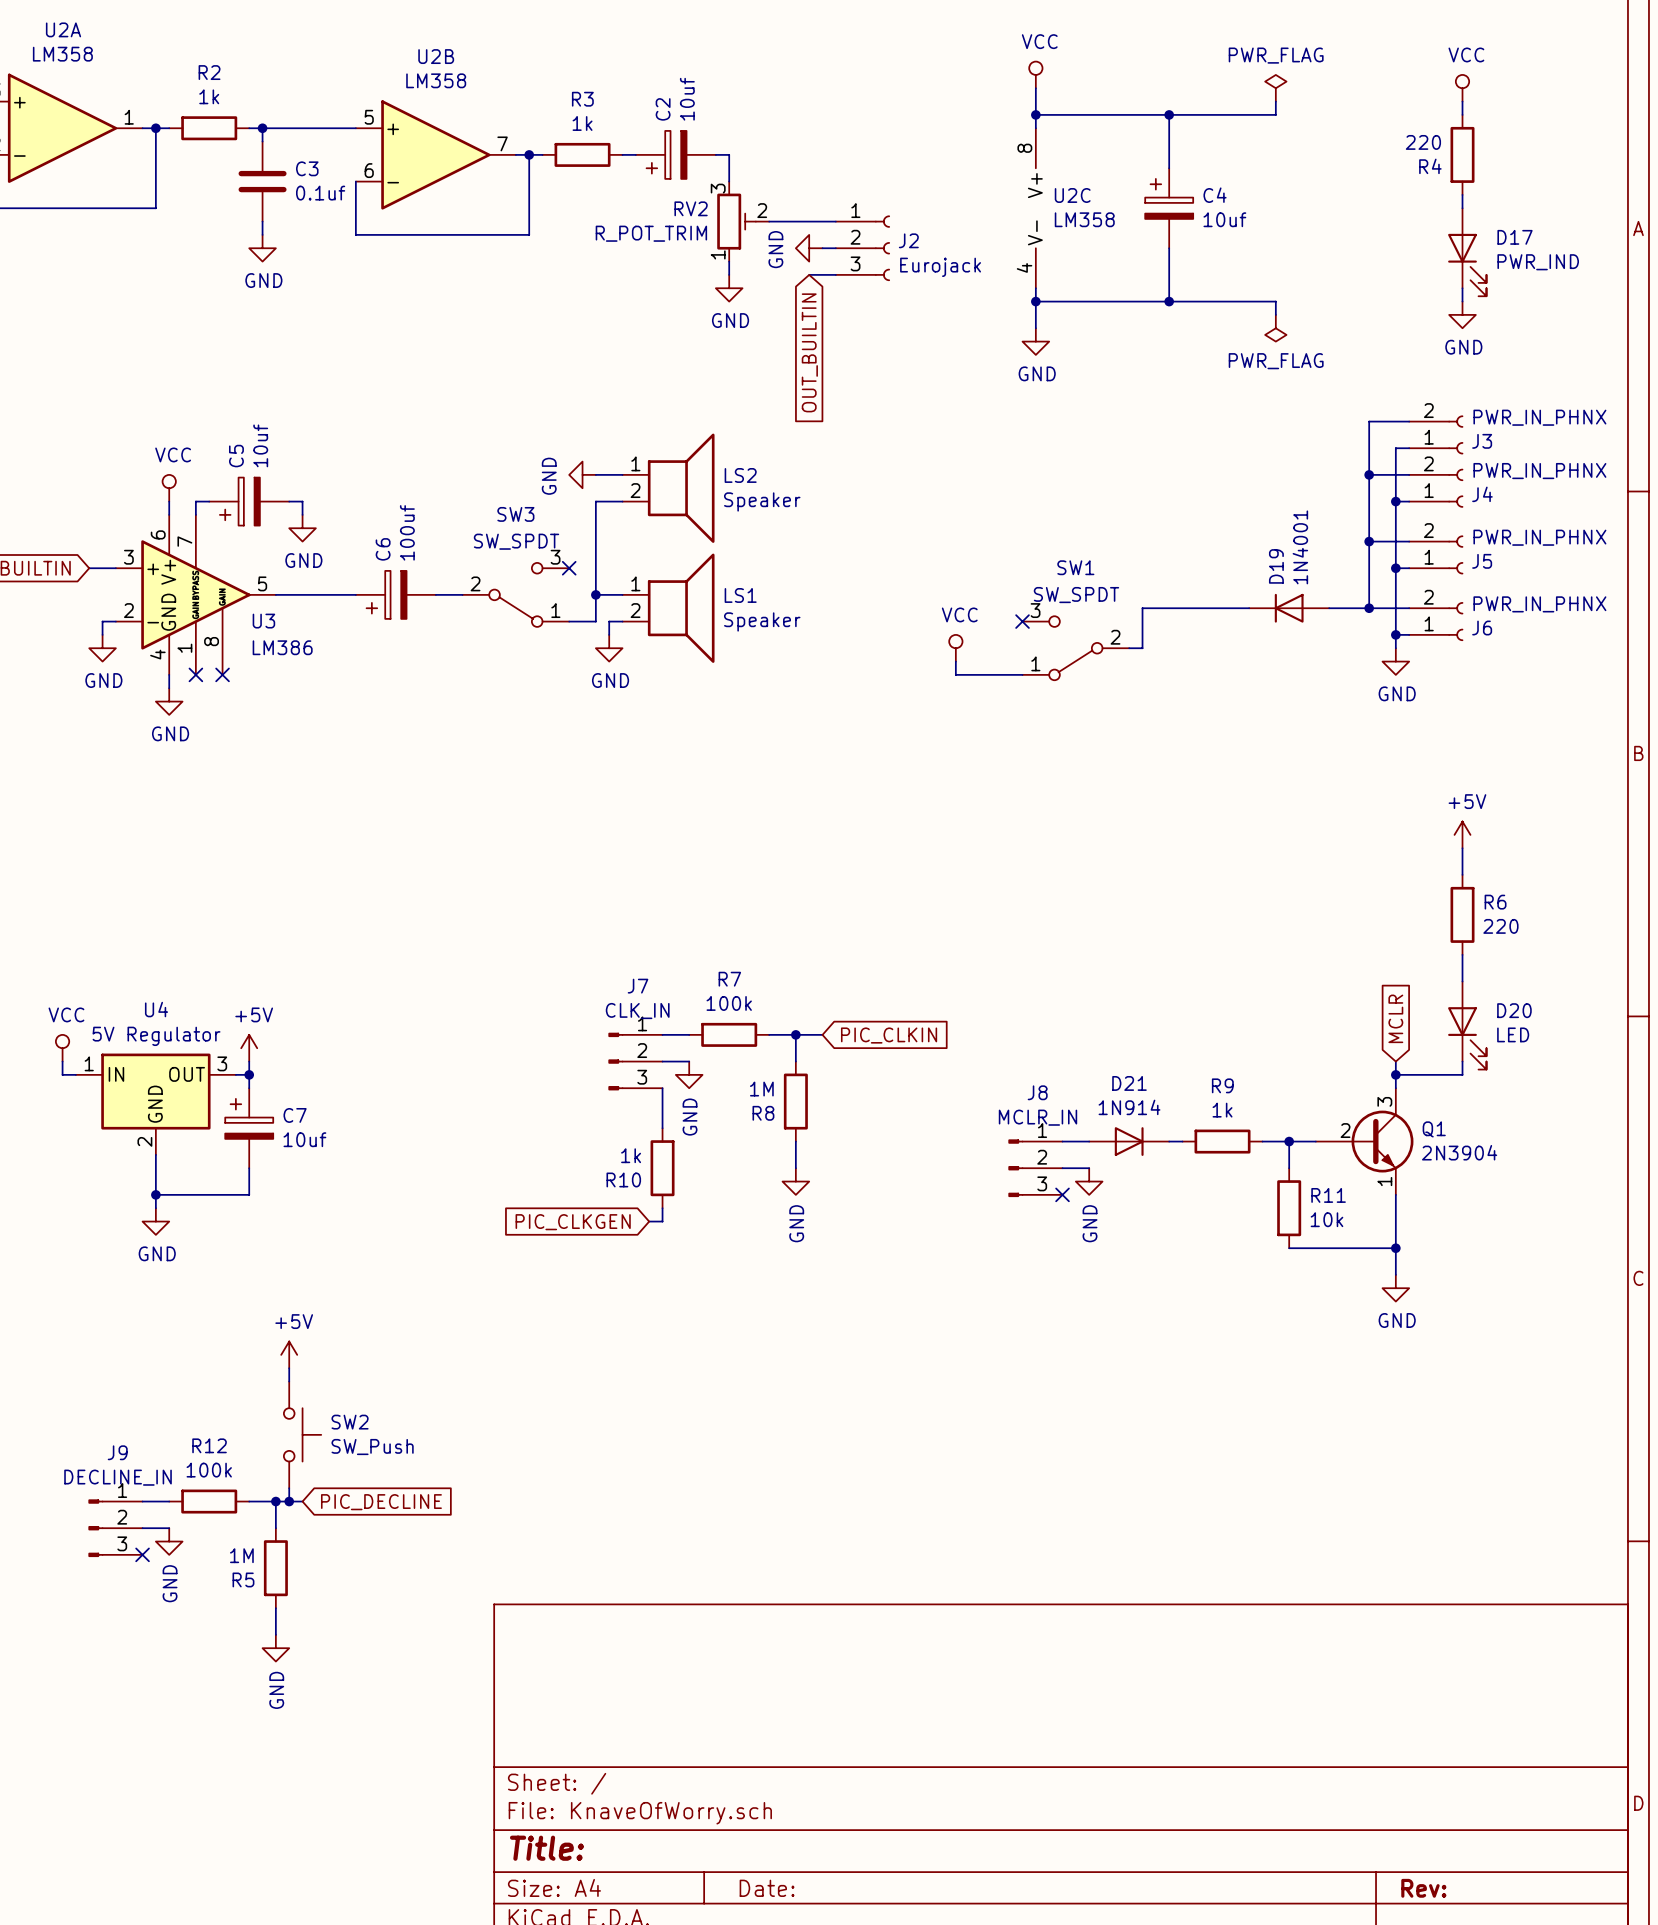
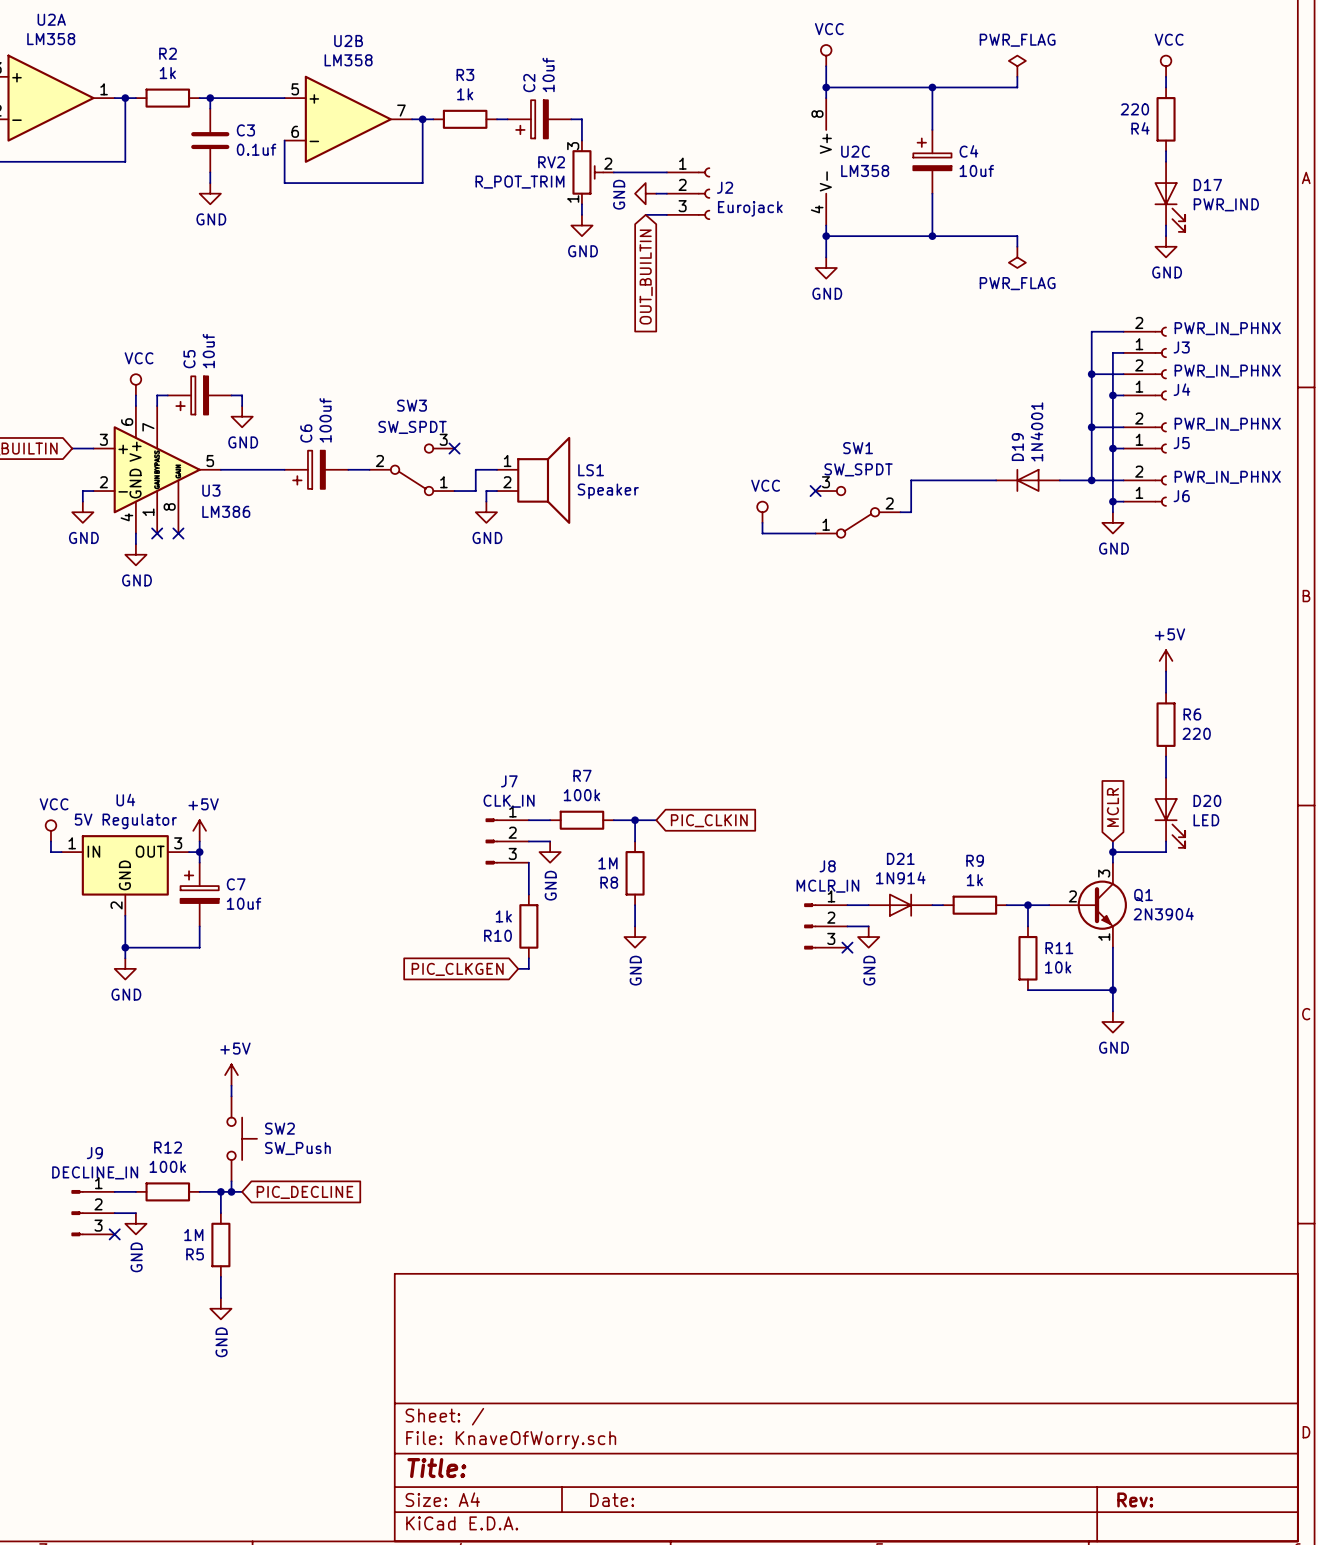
power symbol: GND (582, 474) -> none
wire: (595, 474) (622, 474) -> none
LS2: Speaker (668, 488) -> none
wire: (622, 501) (595, 501) (595, 594) -> none
junction: (595, 594) -> none

